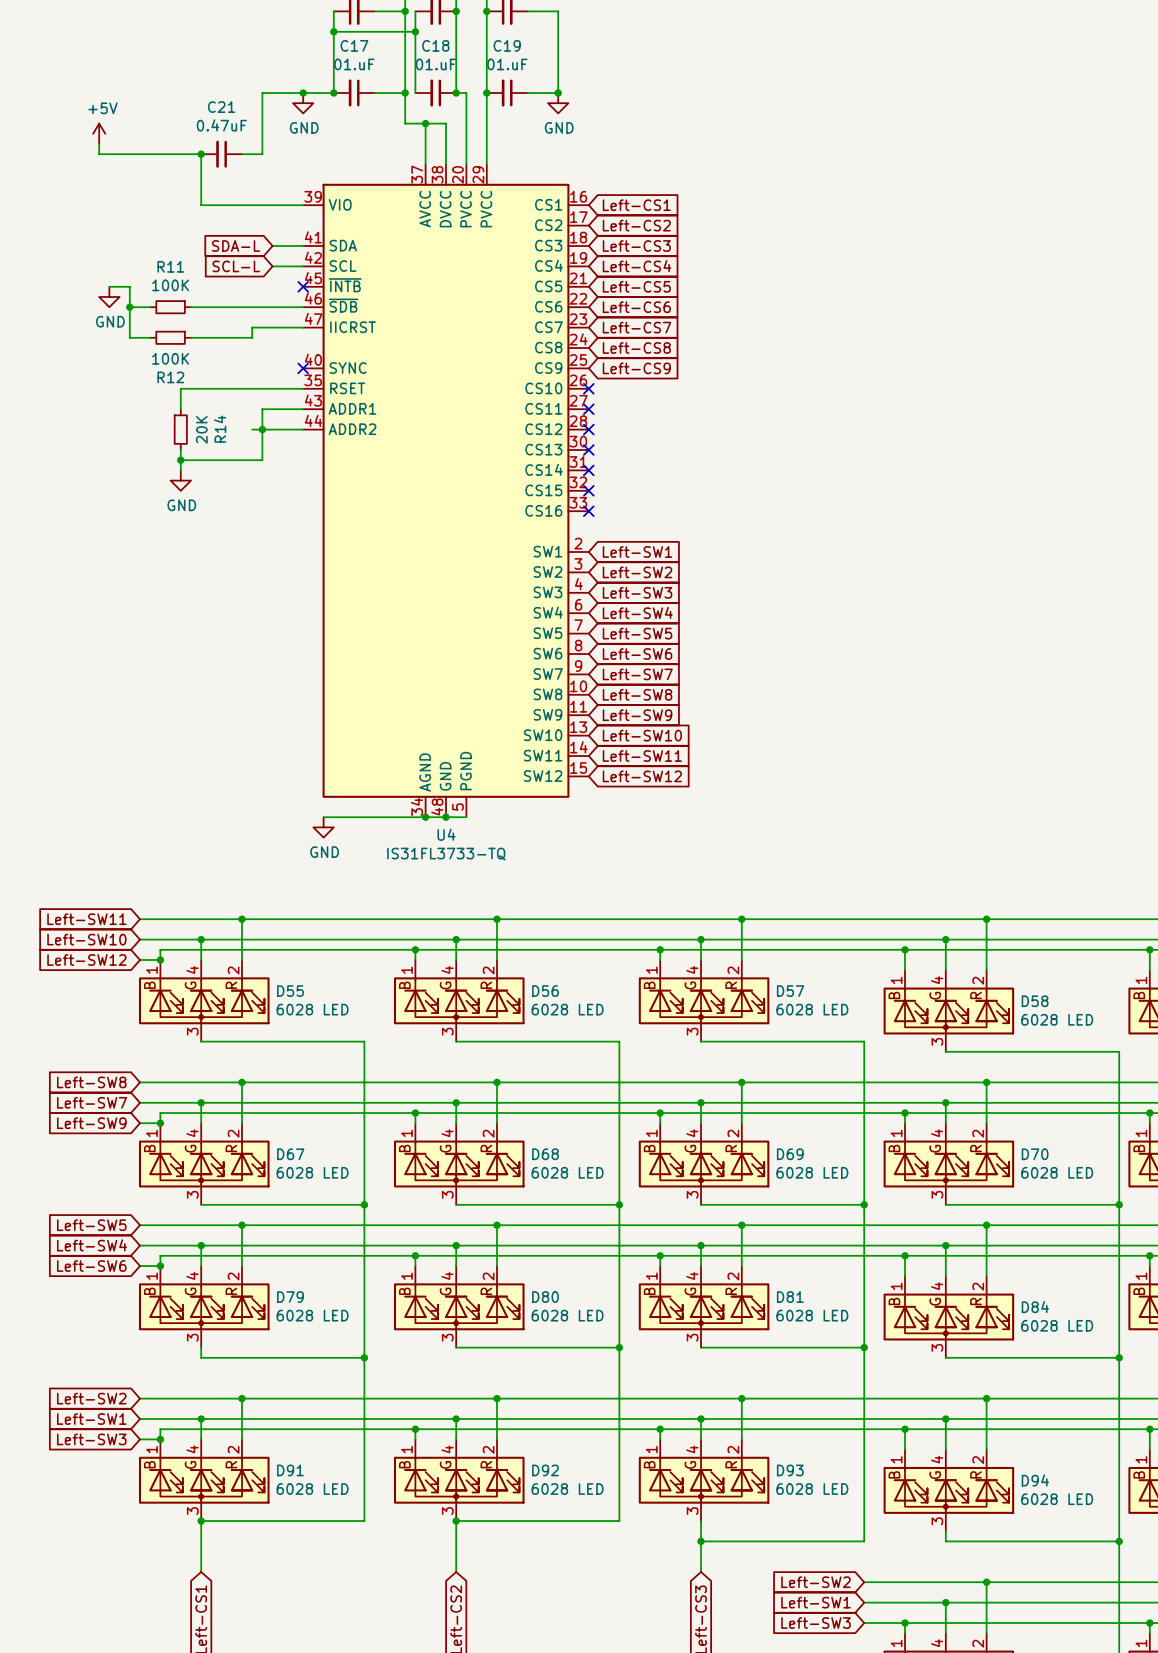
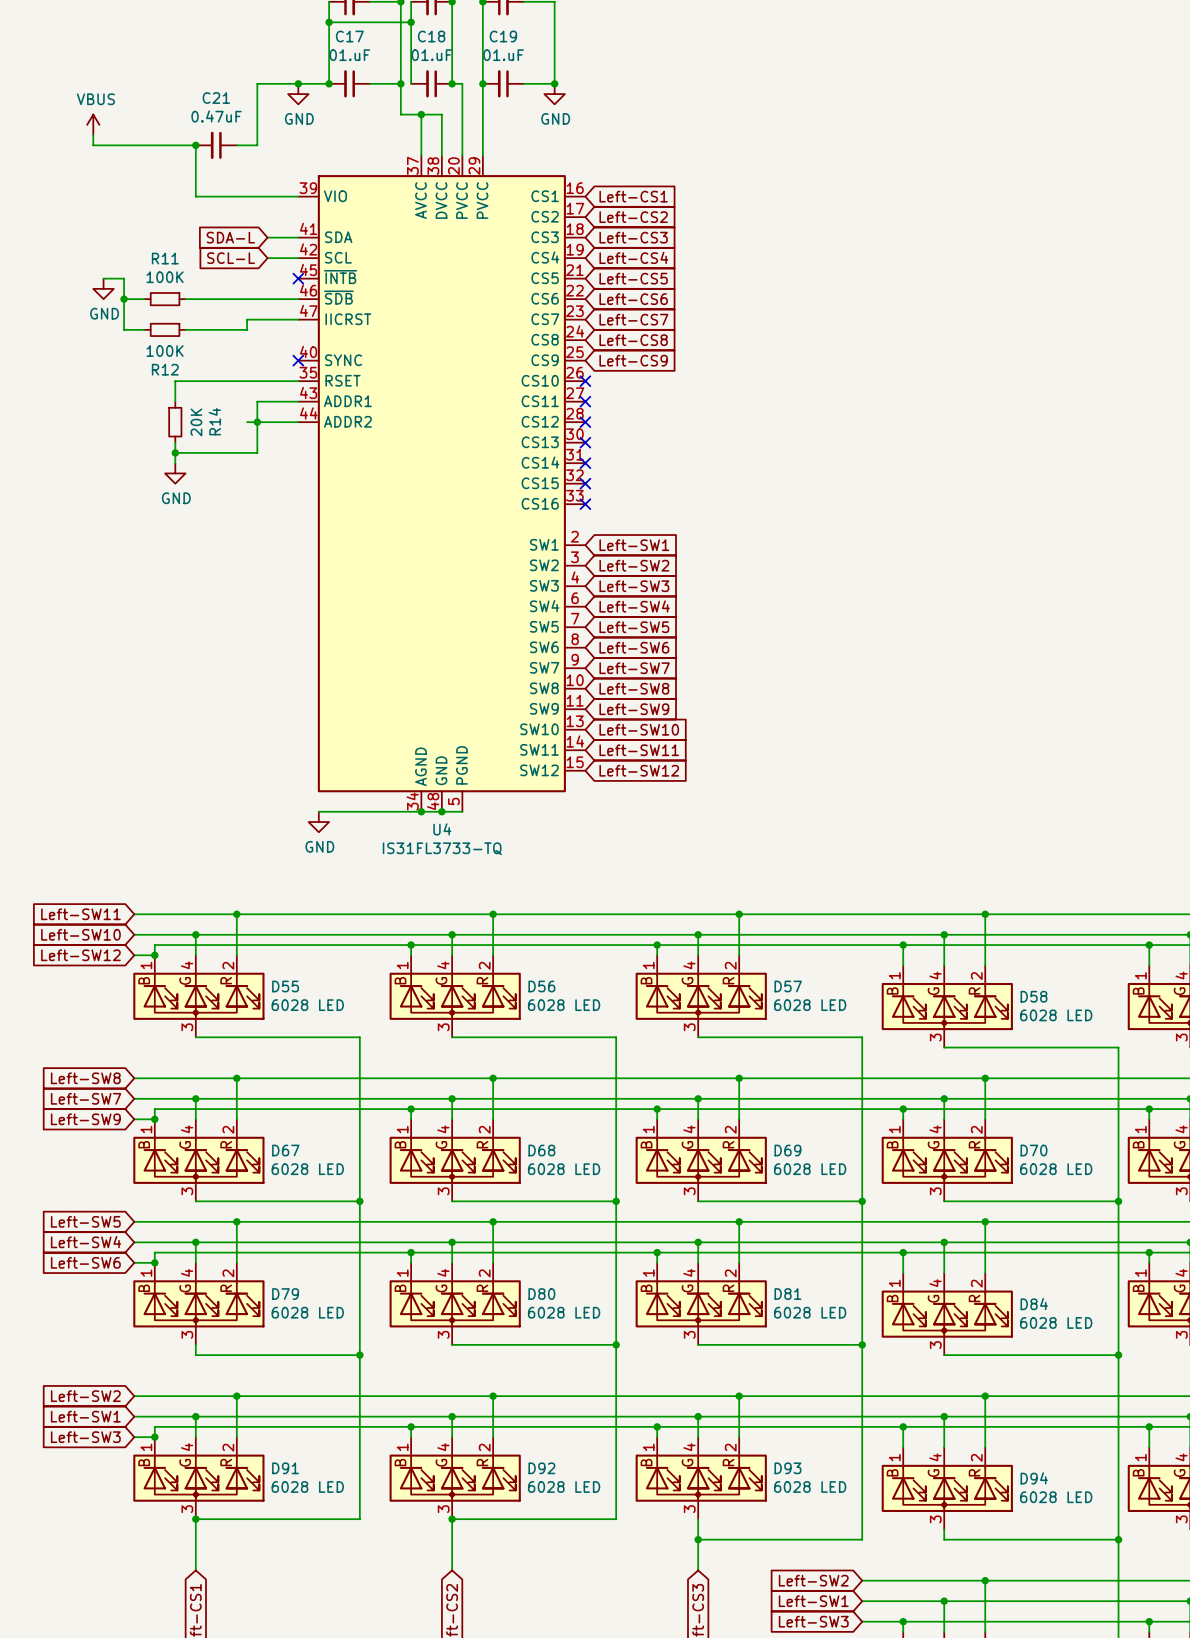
power symbol: +5V (99, 133) -> VBUS (93, 124)

